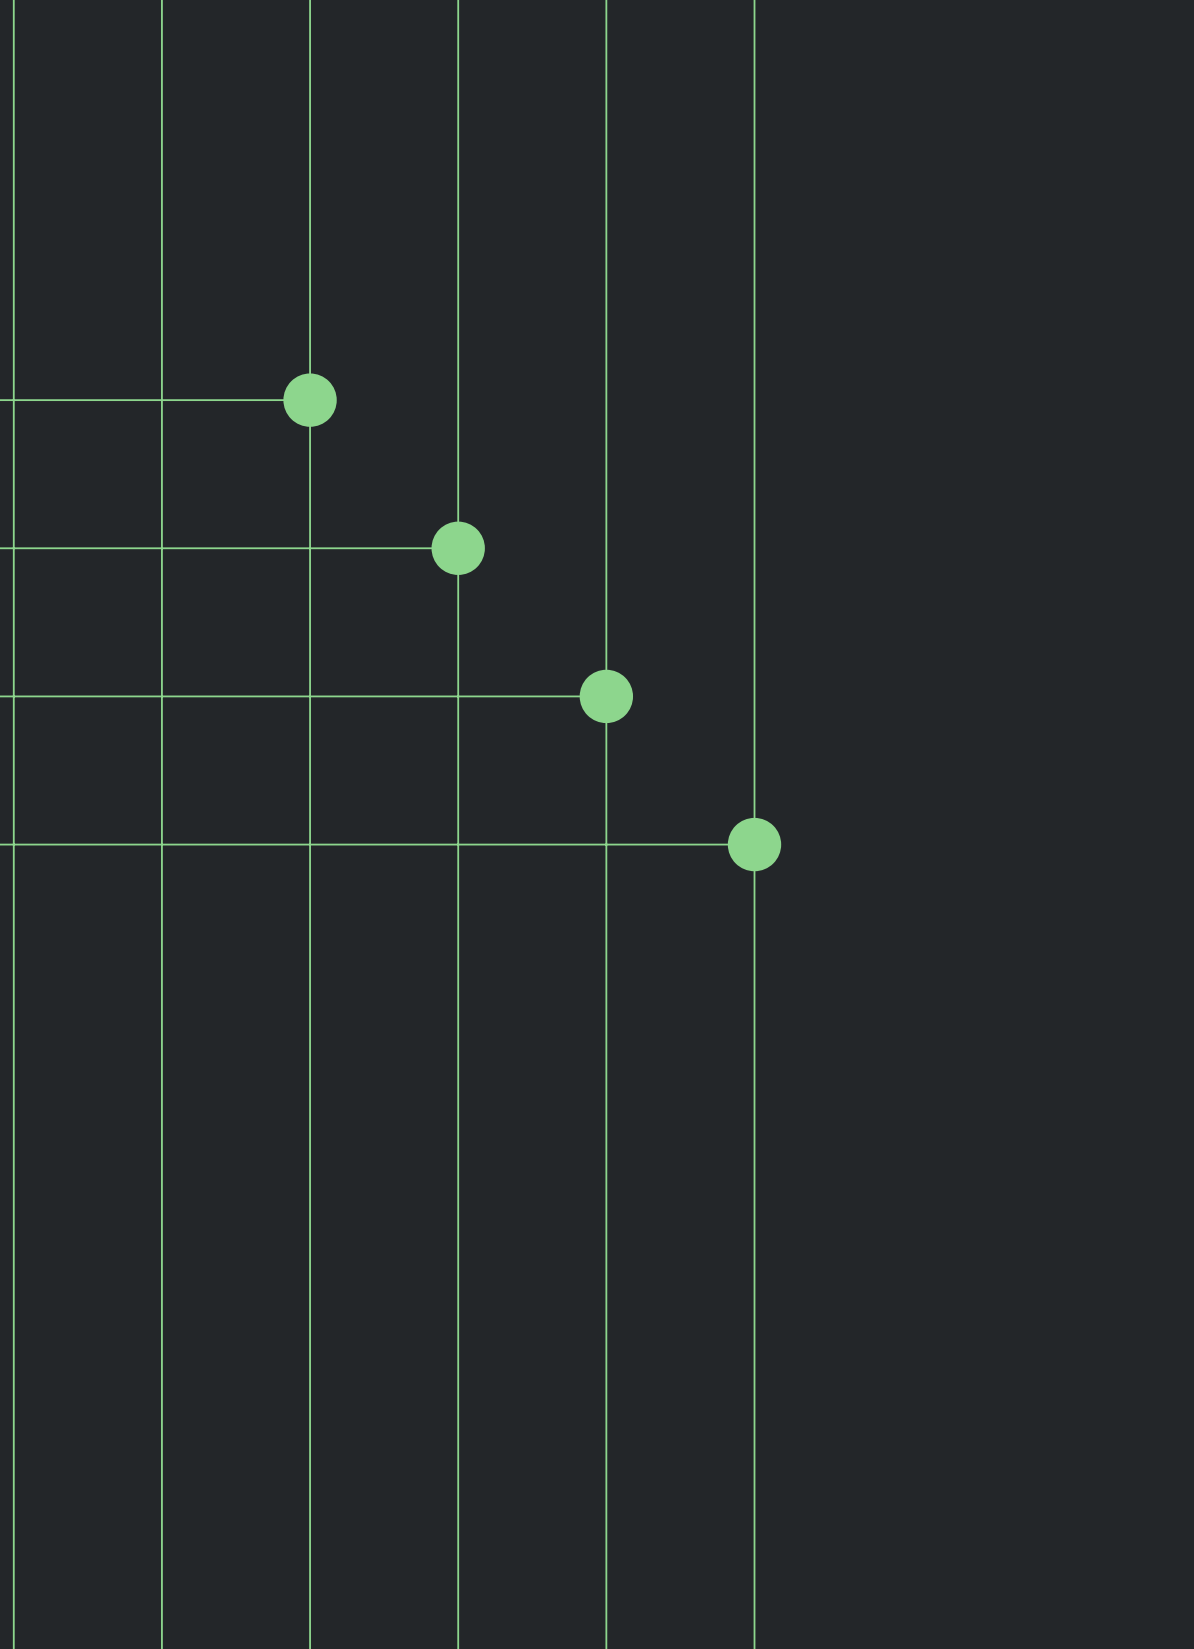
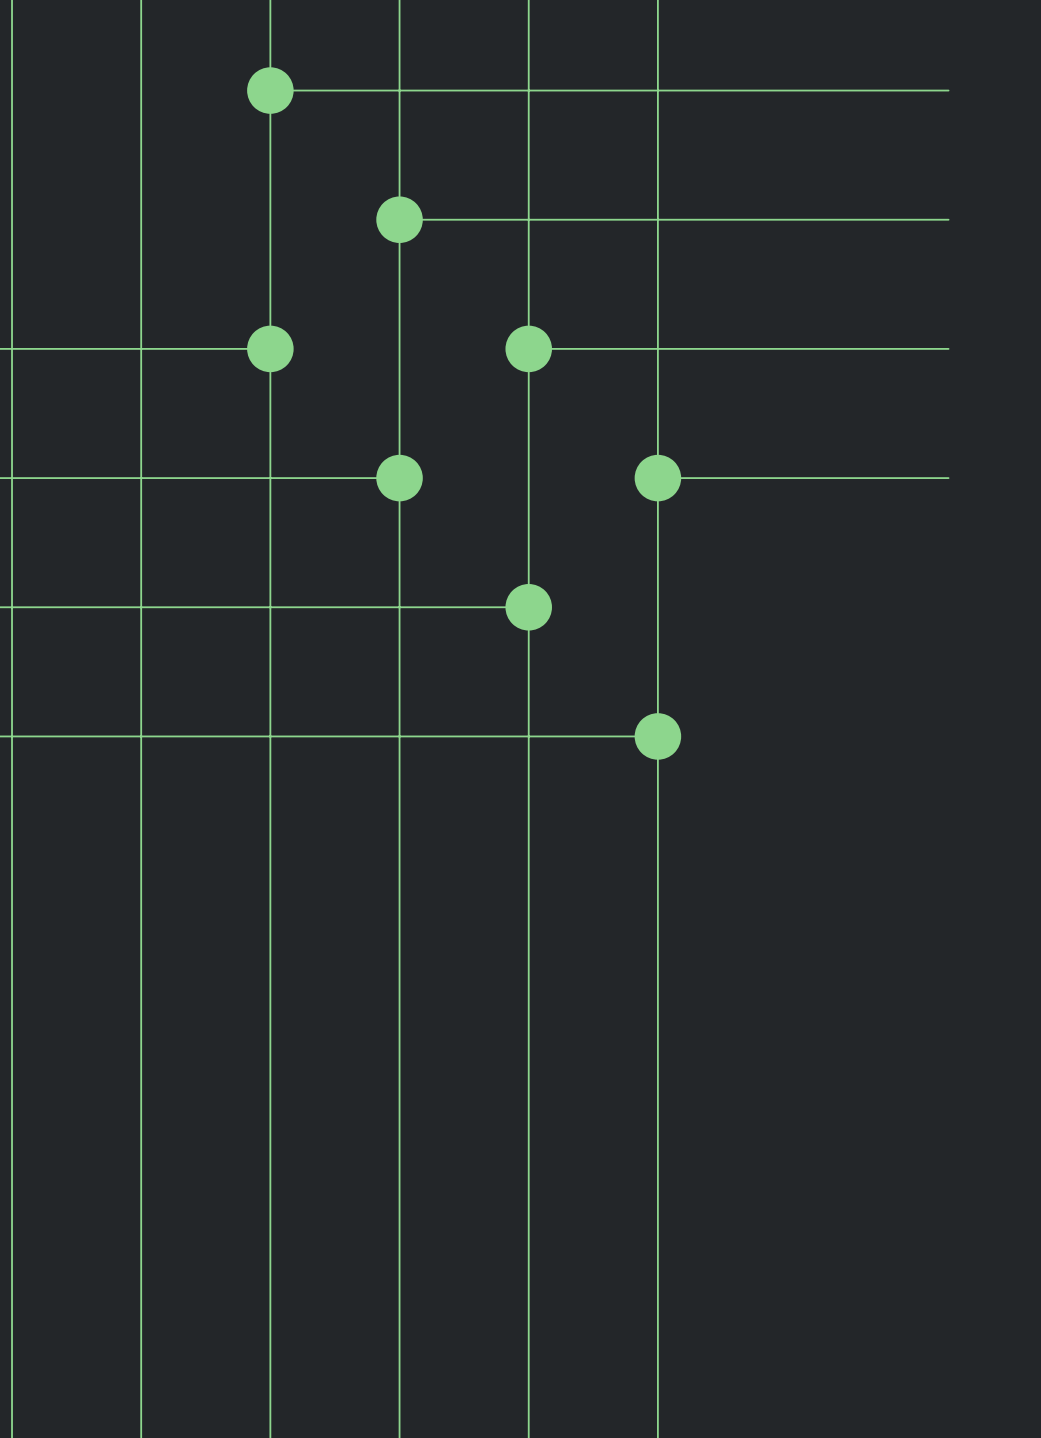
wire: none -> (270, 90) (948, 90)
junction: none -> (270, 90)
wire: none -> (399, 219) (948, 219)
junction: none -> (399, 219)
wire: none -> (528, 348) (948, 348)
junction: none -> (528, 348)
wire: none -> (657, 478) (948, 478)
junction: none -> (657, 478)

